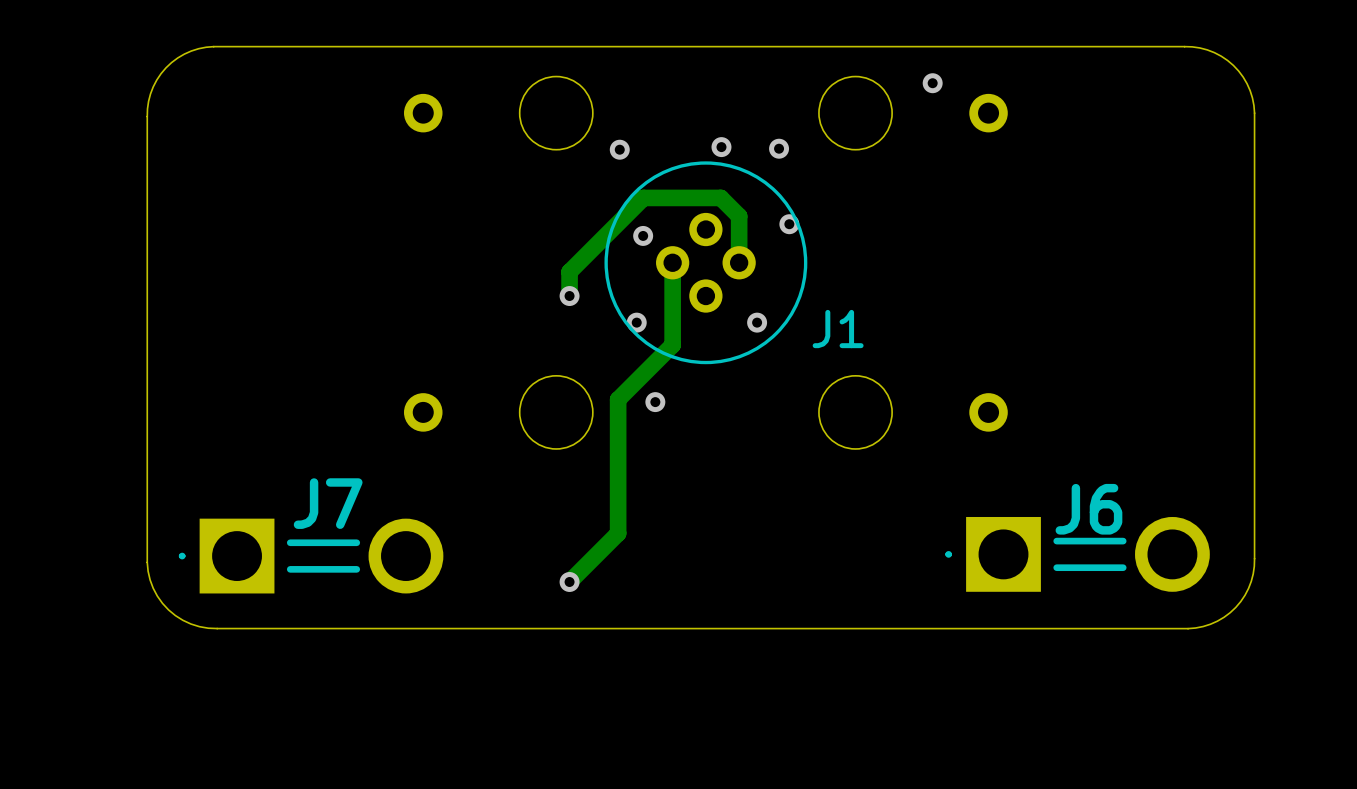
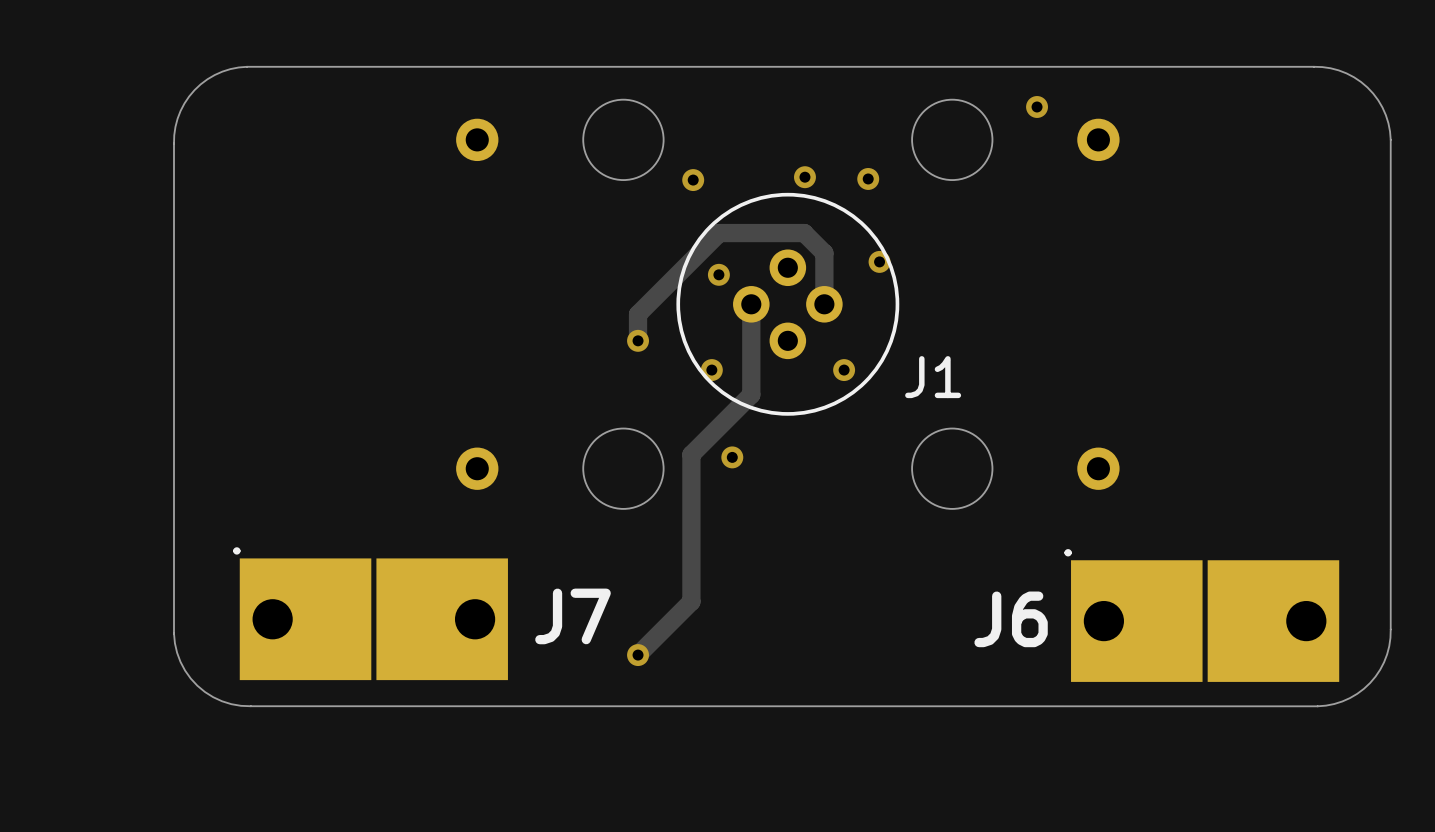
J7 name position: J7 (328, 503) -> J7 (572, 616)
J6 name position: J6 (1088, 509) -> J6 (1011, 619)
J6 footprint: [945, 516, 1210, 592] -> [1064, 549, 1340, 682]
J7 footprint: [178, 518, 444, 594] -> [233, 547, 508, 681]

